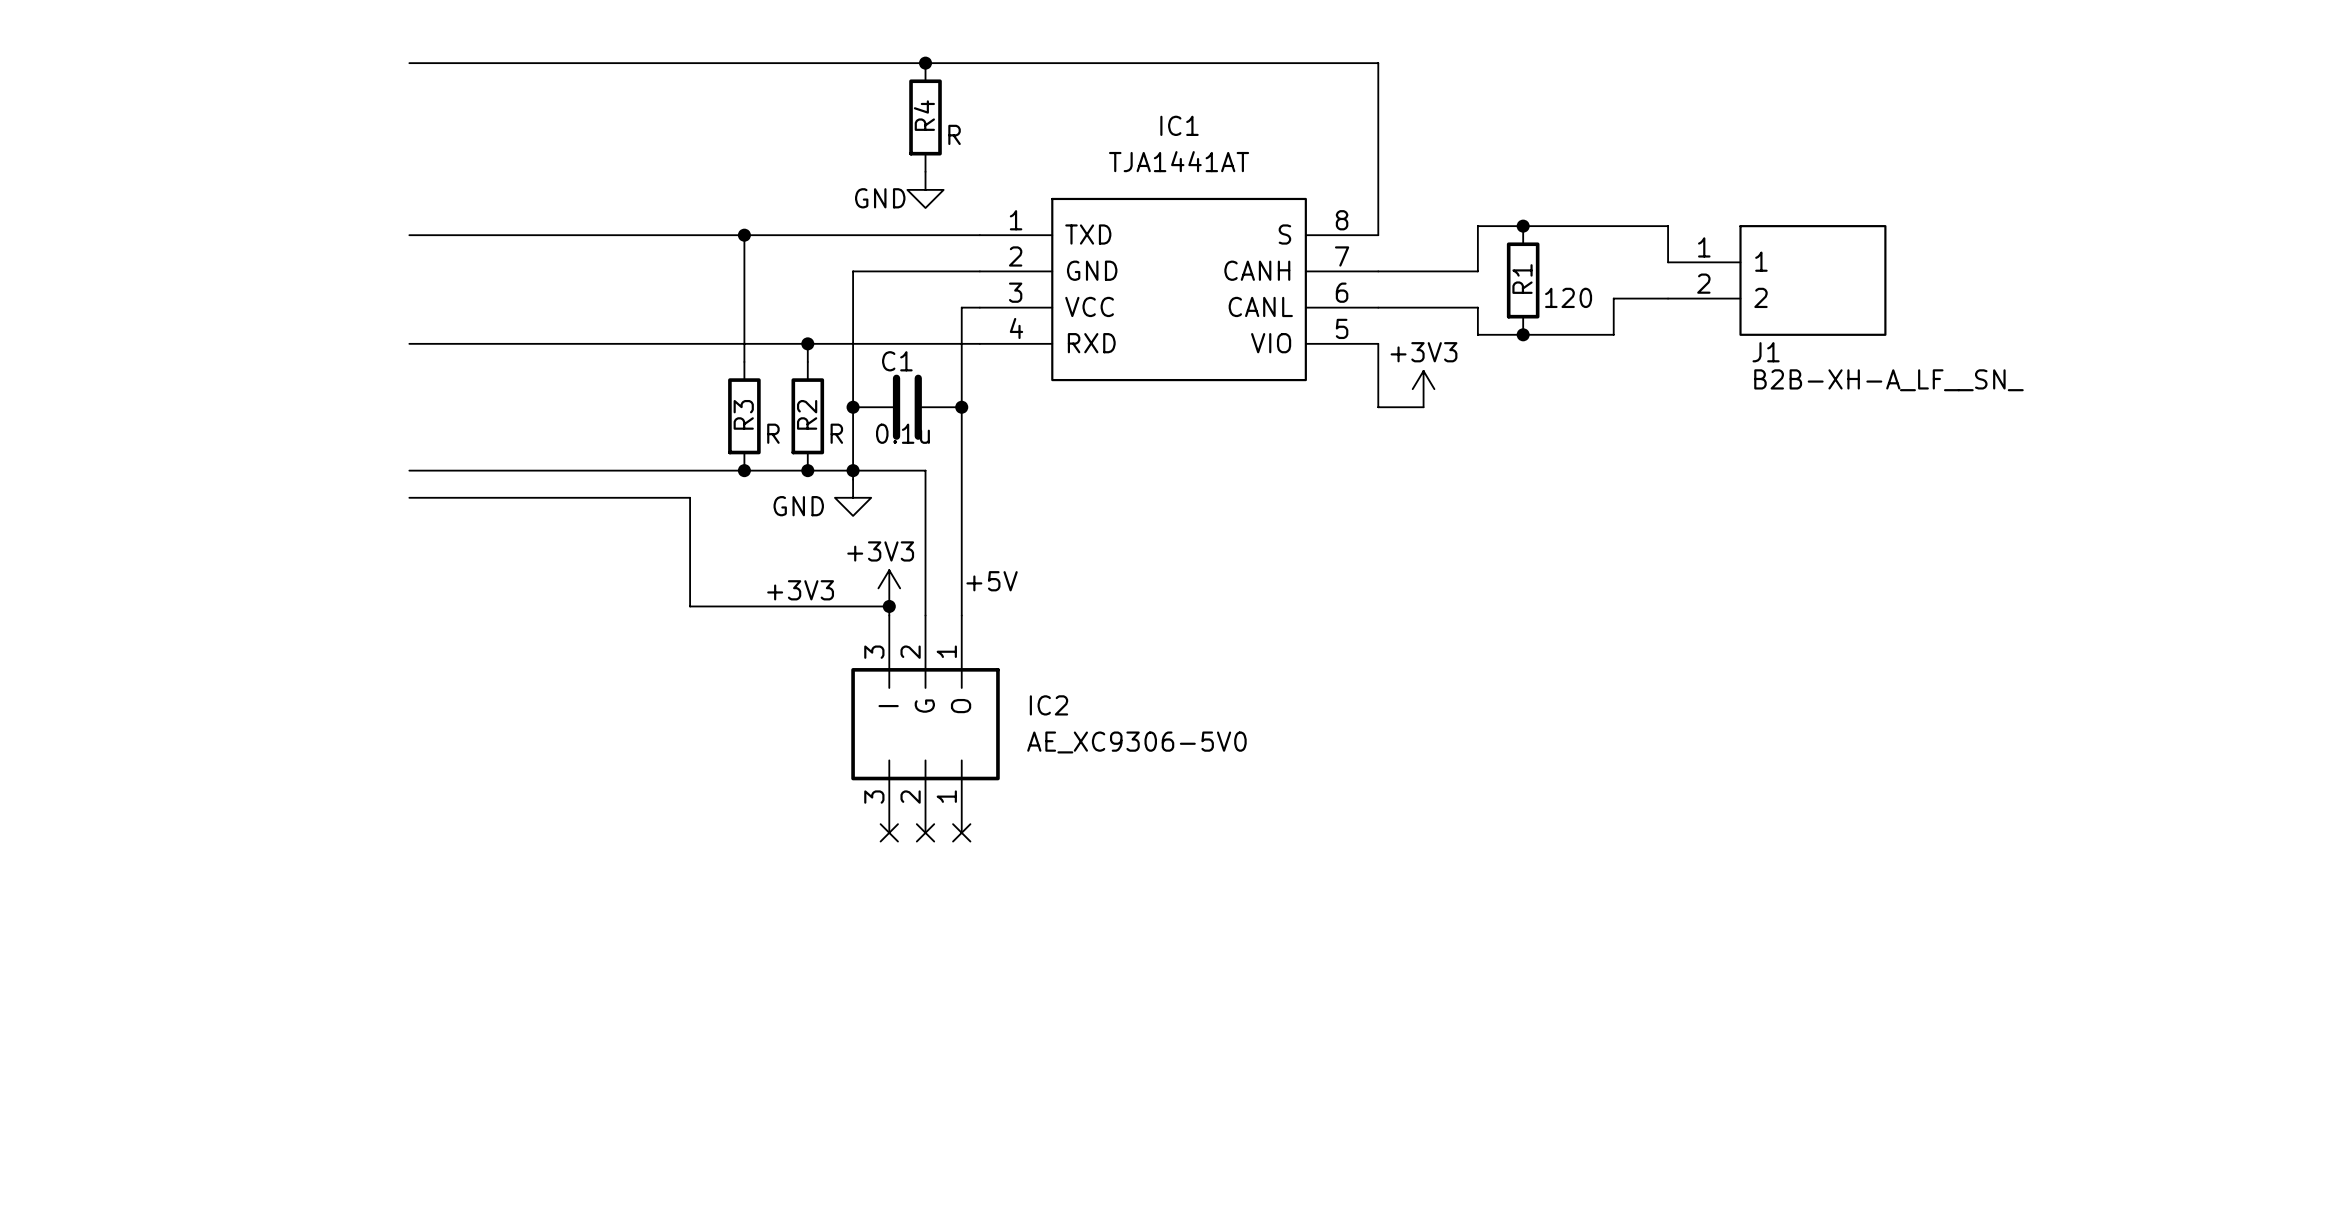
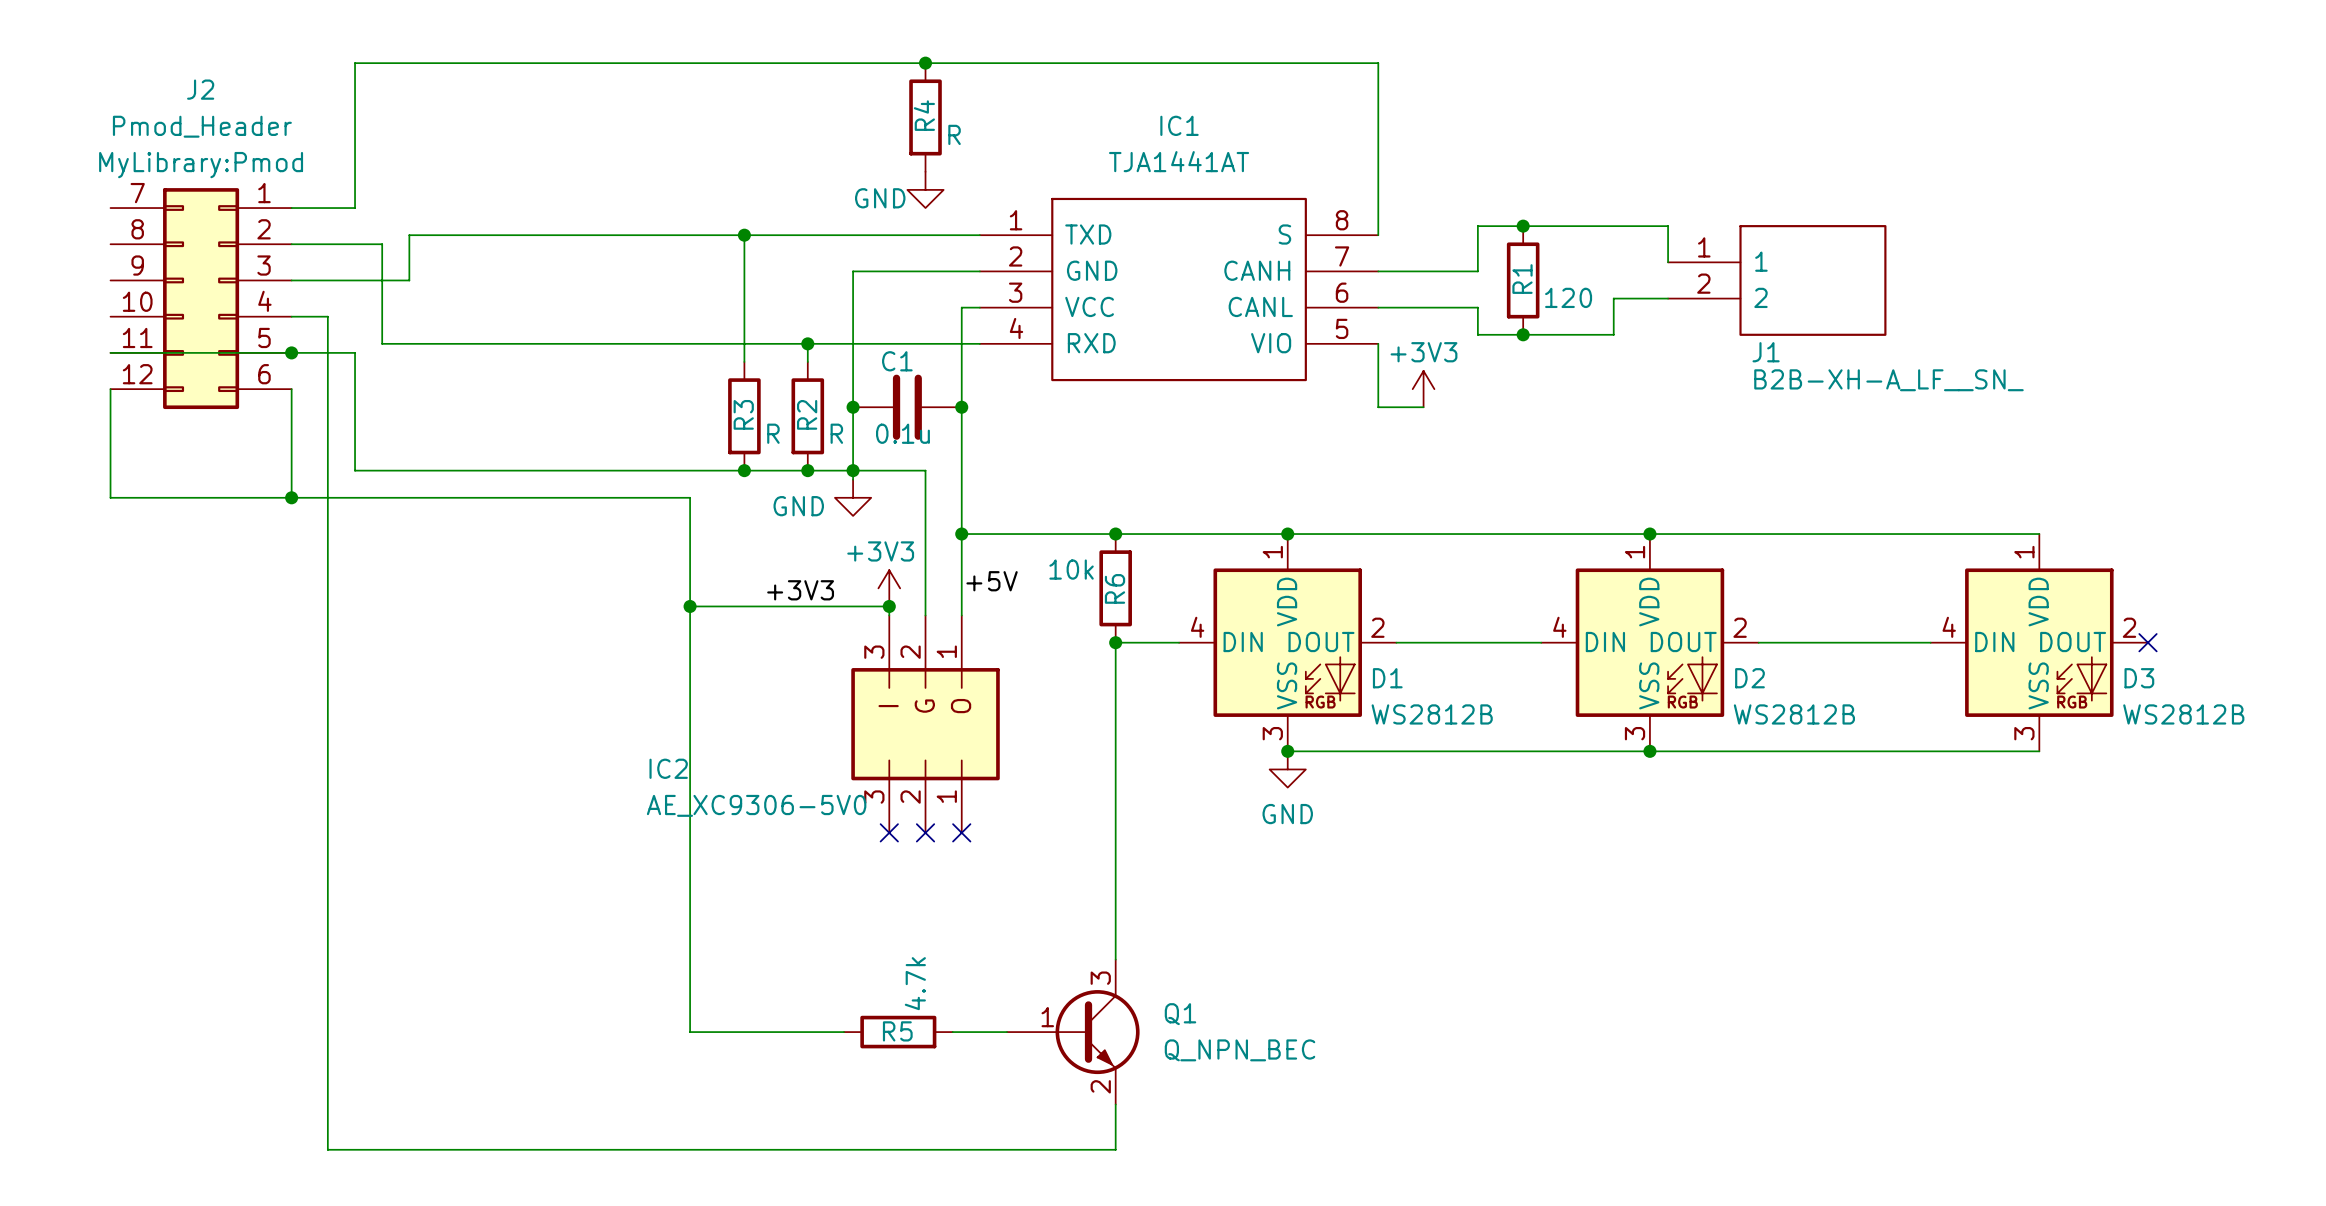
wire: none -> (409, 63) (355, 63) (355, 208) (291, 208)
wire: none -> (409, 235) (409, 280) (291, 280)
wire: none -> (291, 244) (382, 244) (382, 343) (409, 343)
J2: none -> Pmod_Header (201, 298)
wire: none -> (291, 316) (327, 316) (327, 1149) (1115, 1149) (1115, 1104)
wire: none -> (110, 352) (355, 352) (355, 470) (409, 470)
junction: none -> (291, 352)
wire: none -> (110, 389) (110, 497) (409, 497)
wire: none -> (291, 389) (291, 497)
junction: none -> (291, 497)
wire: none -> (961, 534) (2039, 534)
junction: none -> (961, 534)
junction: none -> (1115, 534)
junction: none -> (1287, 534)
junction: none -> (1649, 534)
R6: none -> 10k (1115, 588)
wire: none -> (690, 606) (690, 1032) (844, 1032)
junction: none -> (690, 606)
junction: none -> (1115, 642)
wire: none -> (1179, 642) (1115, 642) (1115, 959)
D1: none -> WS2812B (1287, 642)
wire: none -> (1396, 642) (1541, 642)
D2: none -> WS2812B (1649, 642)
wire: none -> (1758, 642) (1930, 642)
D3: none -> WS2812B (2039, 642)
no-connect mark: none -> (2148, 642)
IC2 name position: IC2 (1048, 705) -> IC2 (668, 768)
IC2 value position: AE_XC9306-5V0 (1136, 742) -> AE_XC9306-5V0 (756, 805)
wire: none -> (1287, 751) (2039, 751)
junction: none -> (1287, 751)
junction: none -> (1649, 751)
power symbol: none -> GND (1287, 769)
R5: none -> 4.7k (898, 1032)
wire: none -> (952, 1032) (1007, 1032)
Q1: none -> Q_NPN_BEC (1073, 1032)

